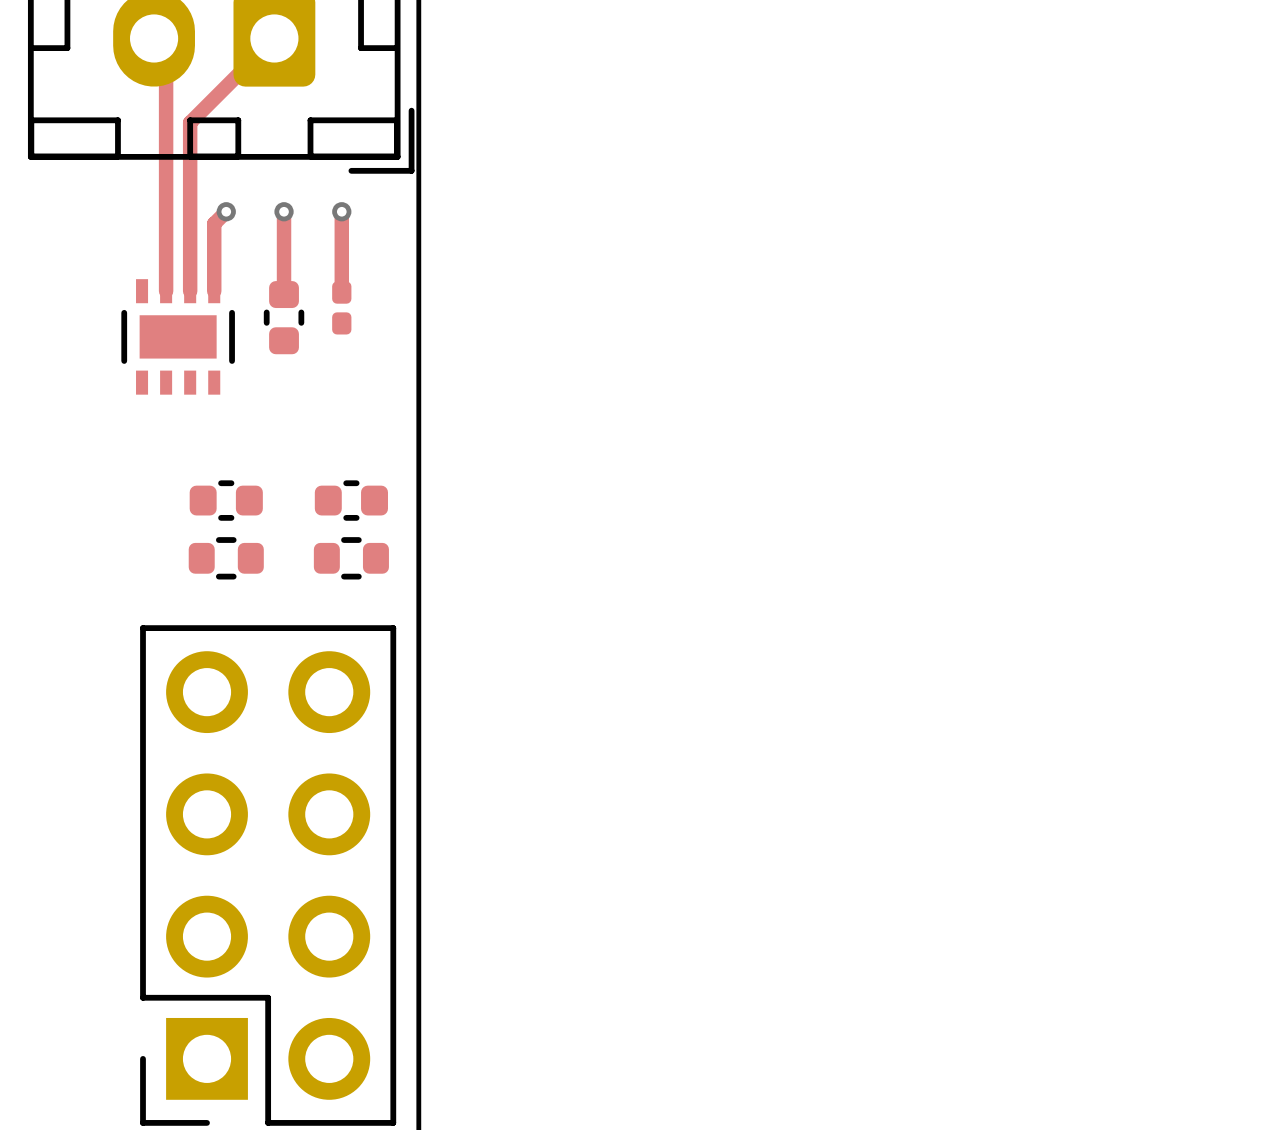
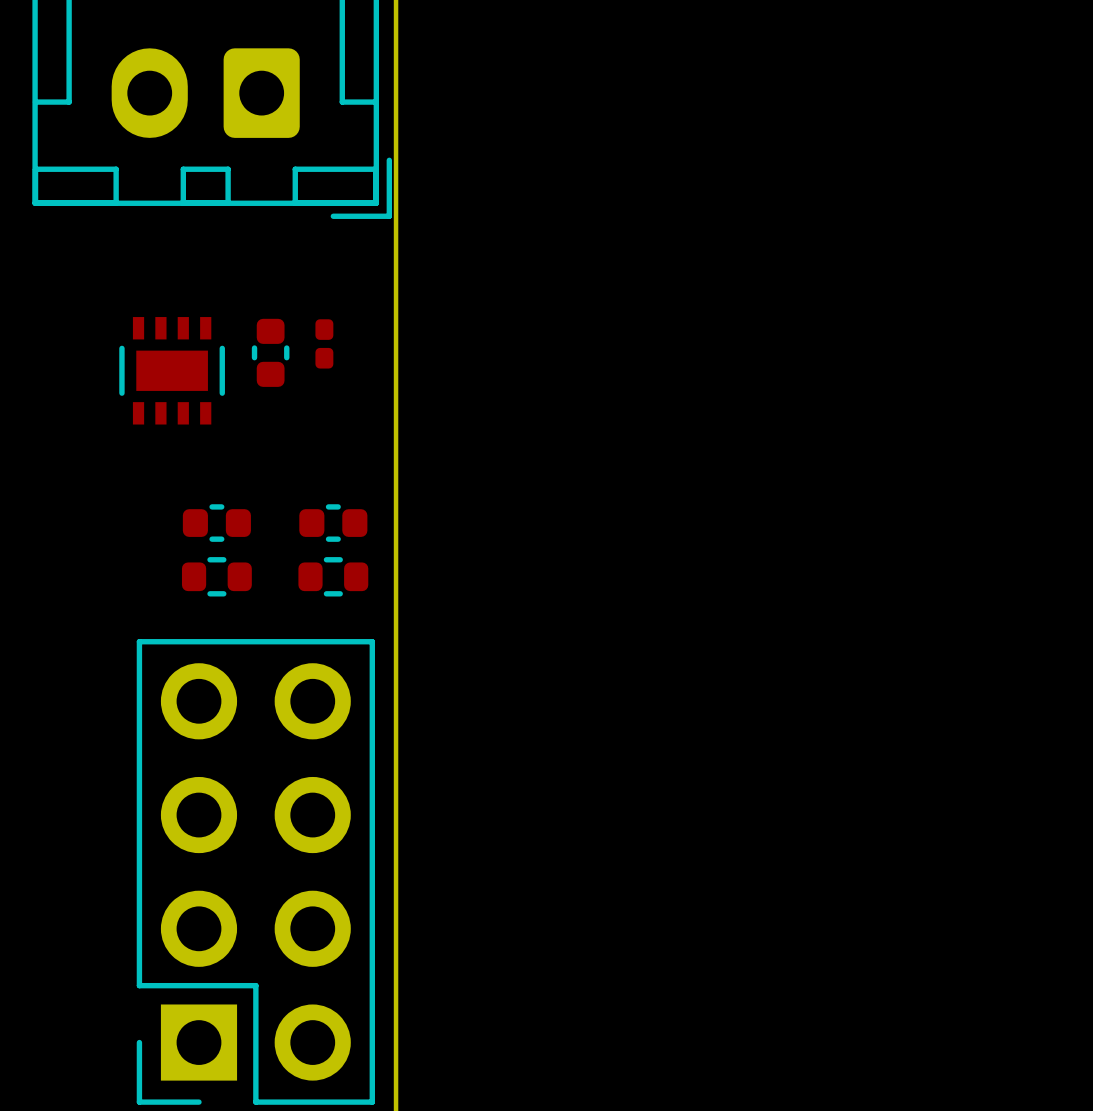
track: (154, 38) (166, 50) (166, 291) -> none
track: (274, 38) (190, 122) (190, 291) -> none
track: (226, 211) (214, 223) (214, 291) -> none
via: (226, 211) -> none
track: (284, 211) (284, 294) -> none
via: (284, 211) -> none
track: (341, 211) (341, 292) -> none
via: (341, 211) -> none

